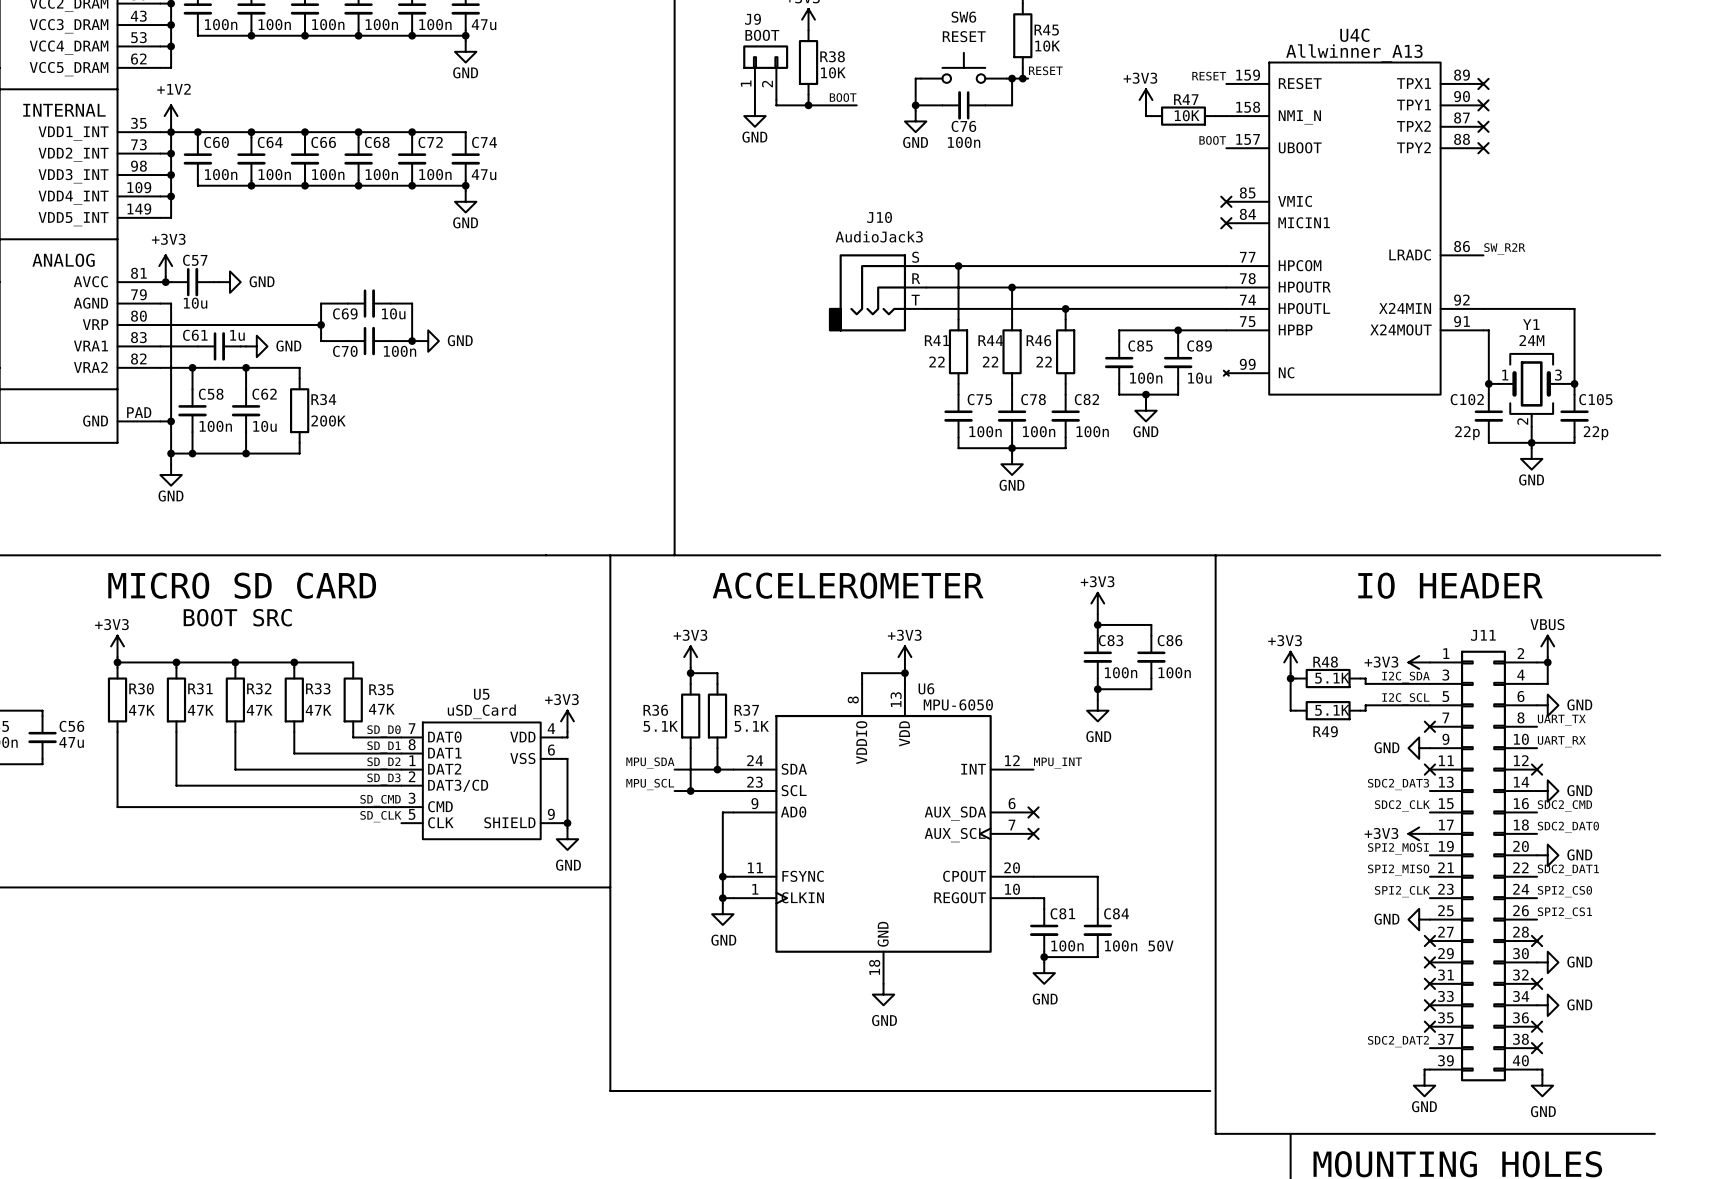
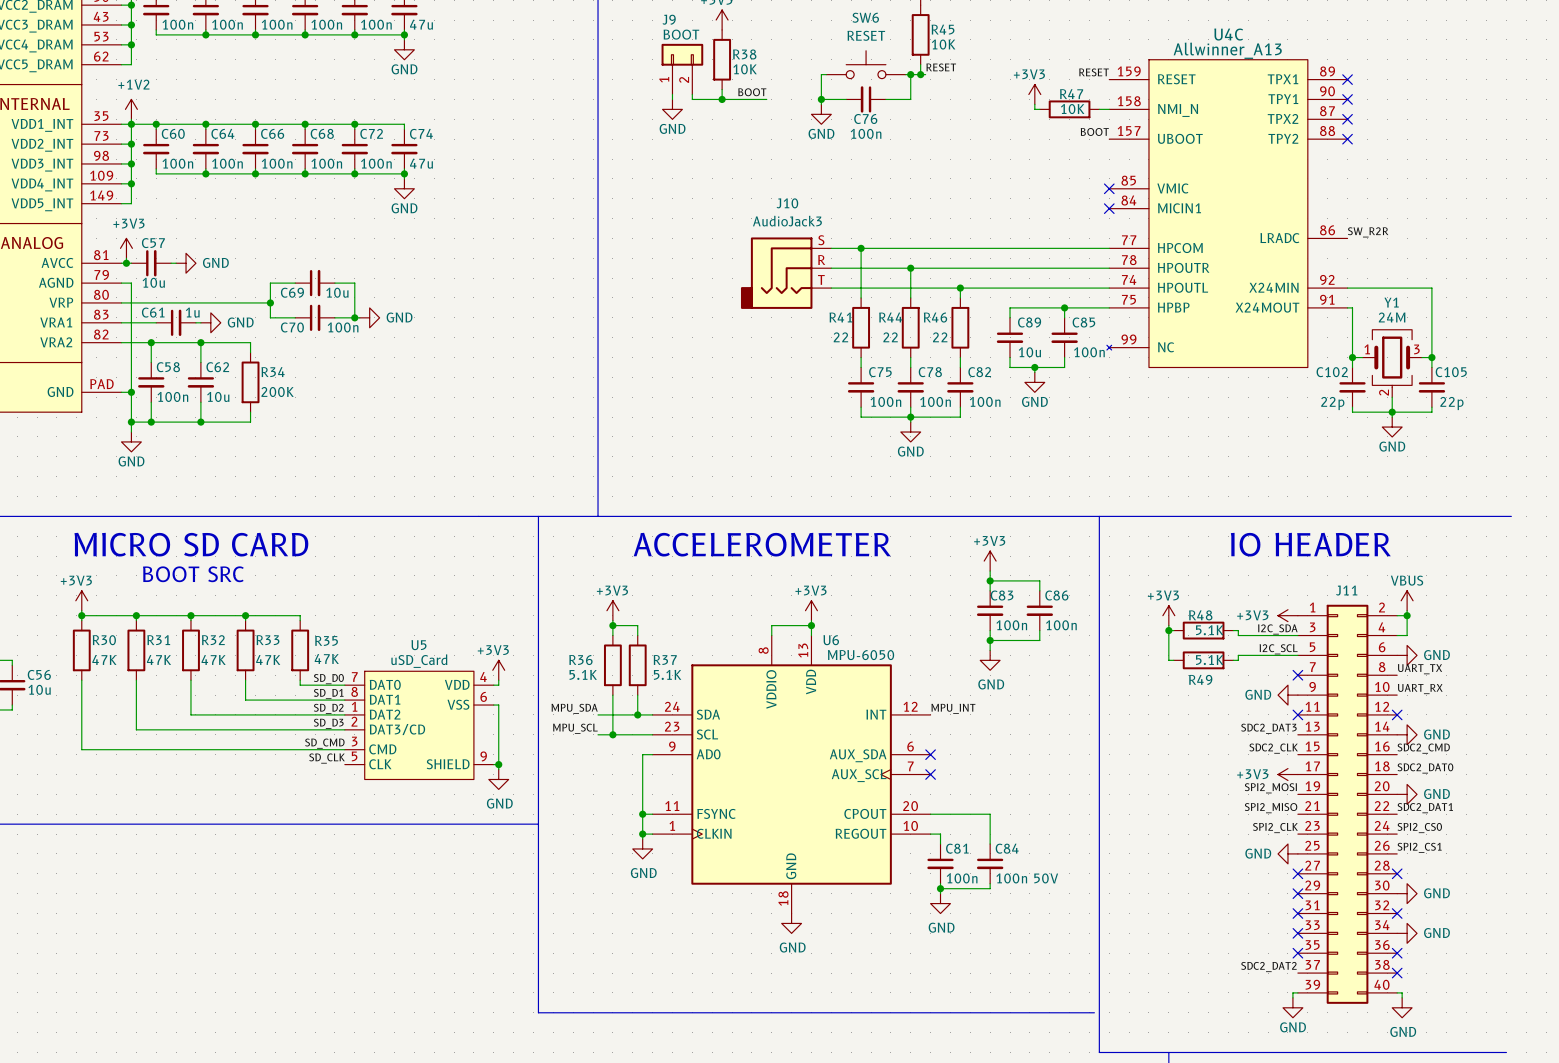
C85 name: C85 (1140, 346) -> C89 (1029, 322)
C89 name: C89 (1199, 346) -> C85 (1083, 322)
C85 value: 100n (1146, 378) -> 10u (1029, 352)
C89 value: 10u (1199, 378) -> 100n (1089, 352)
C56 value: 47u (71, 742) -> 10u (39, 689)

